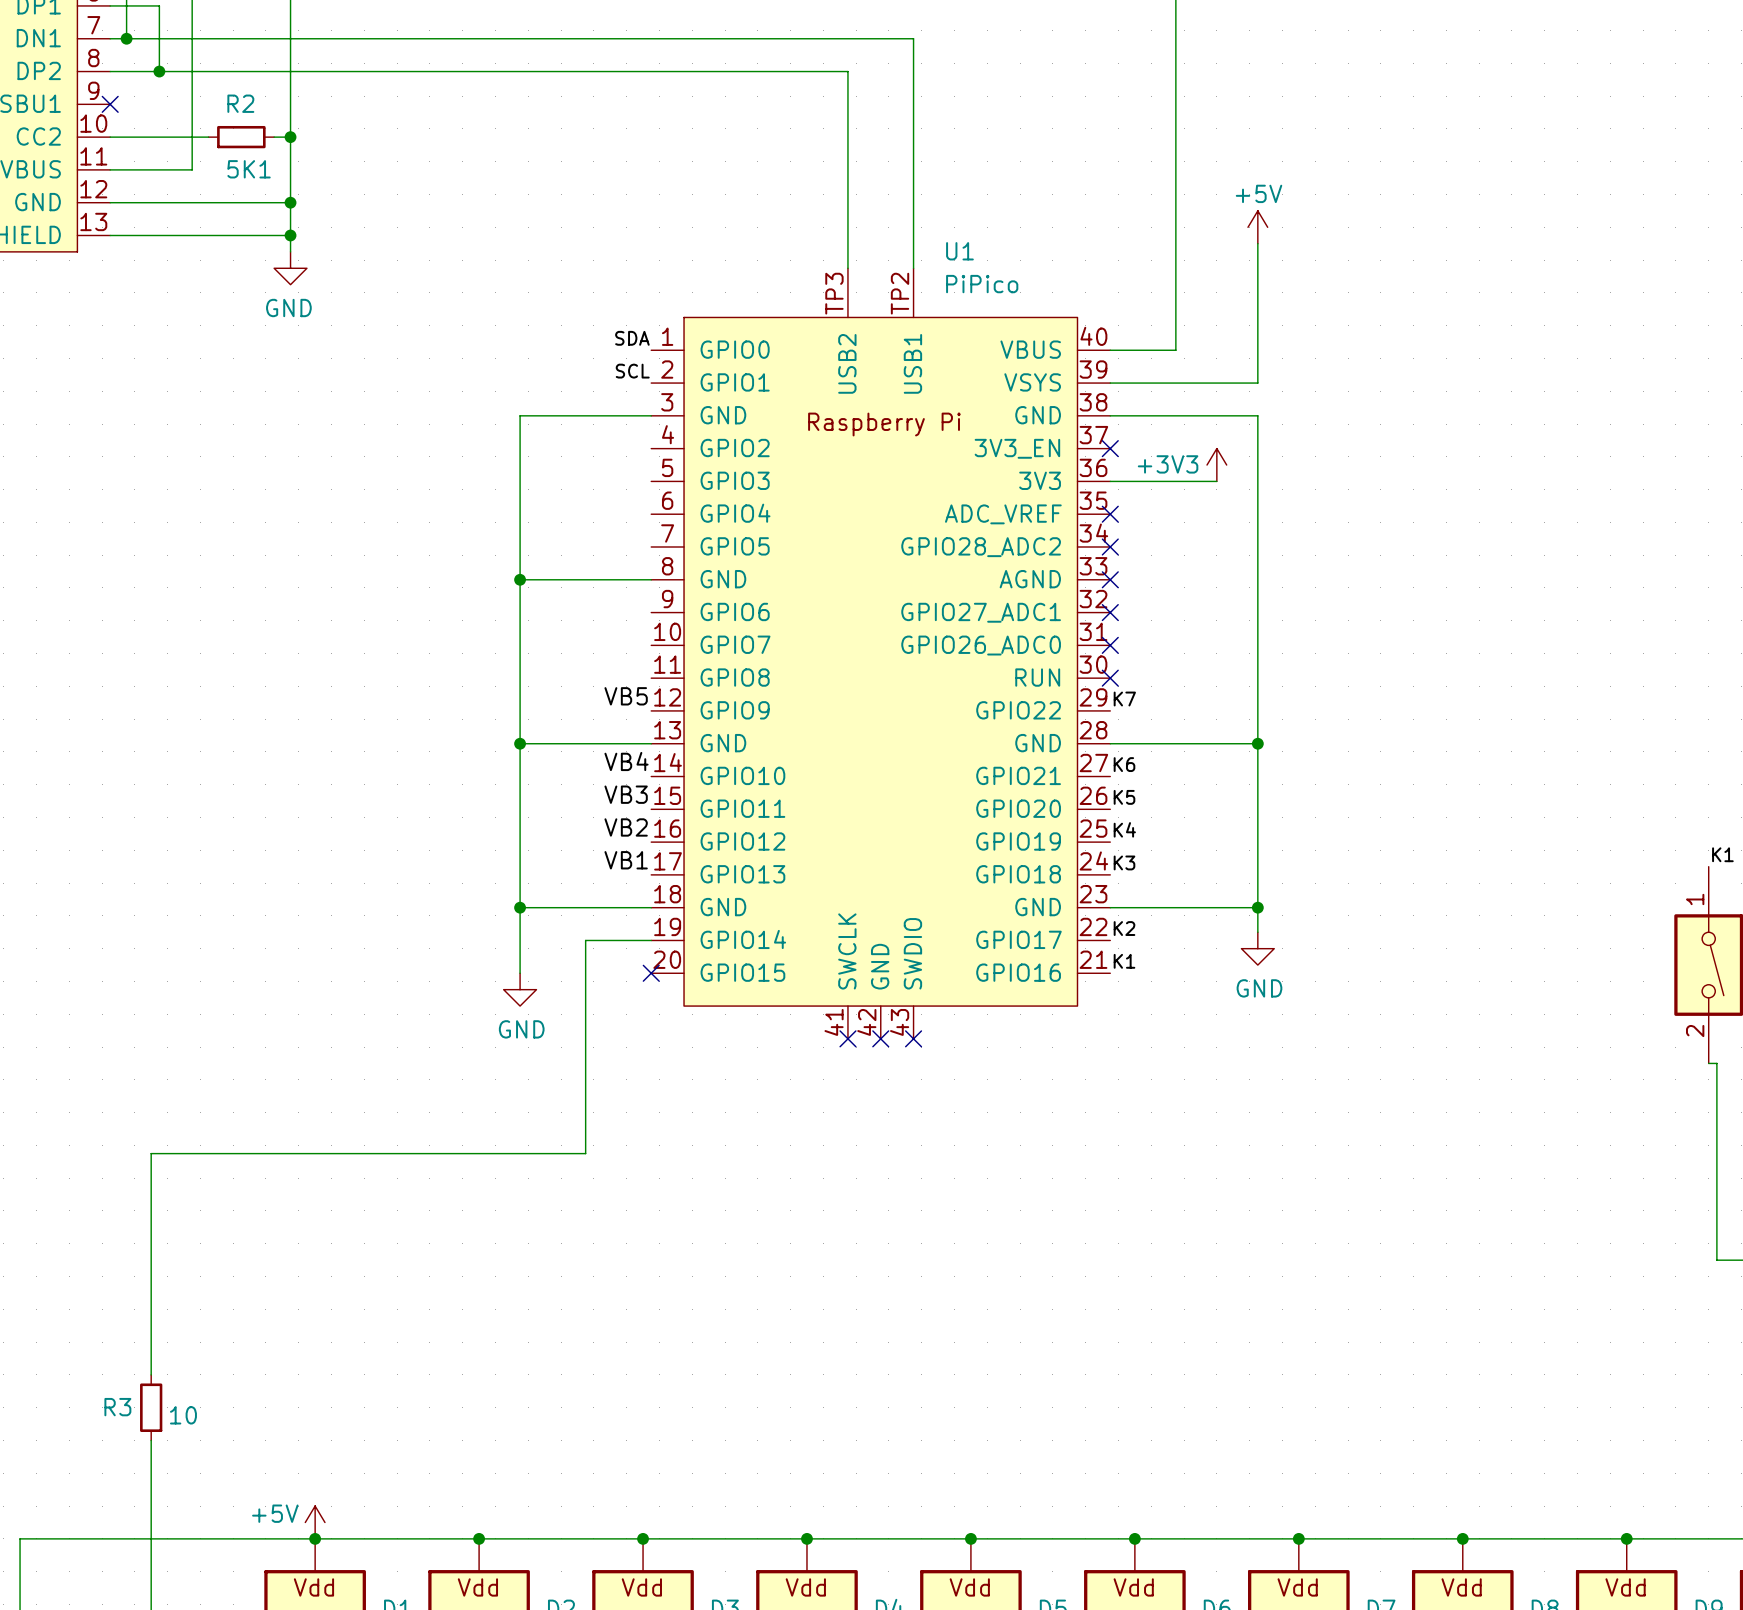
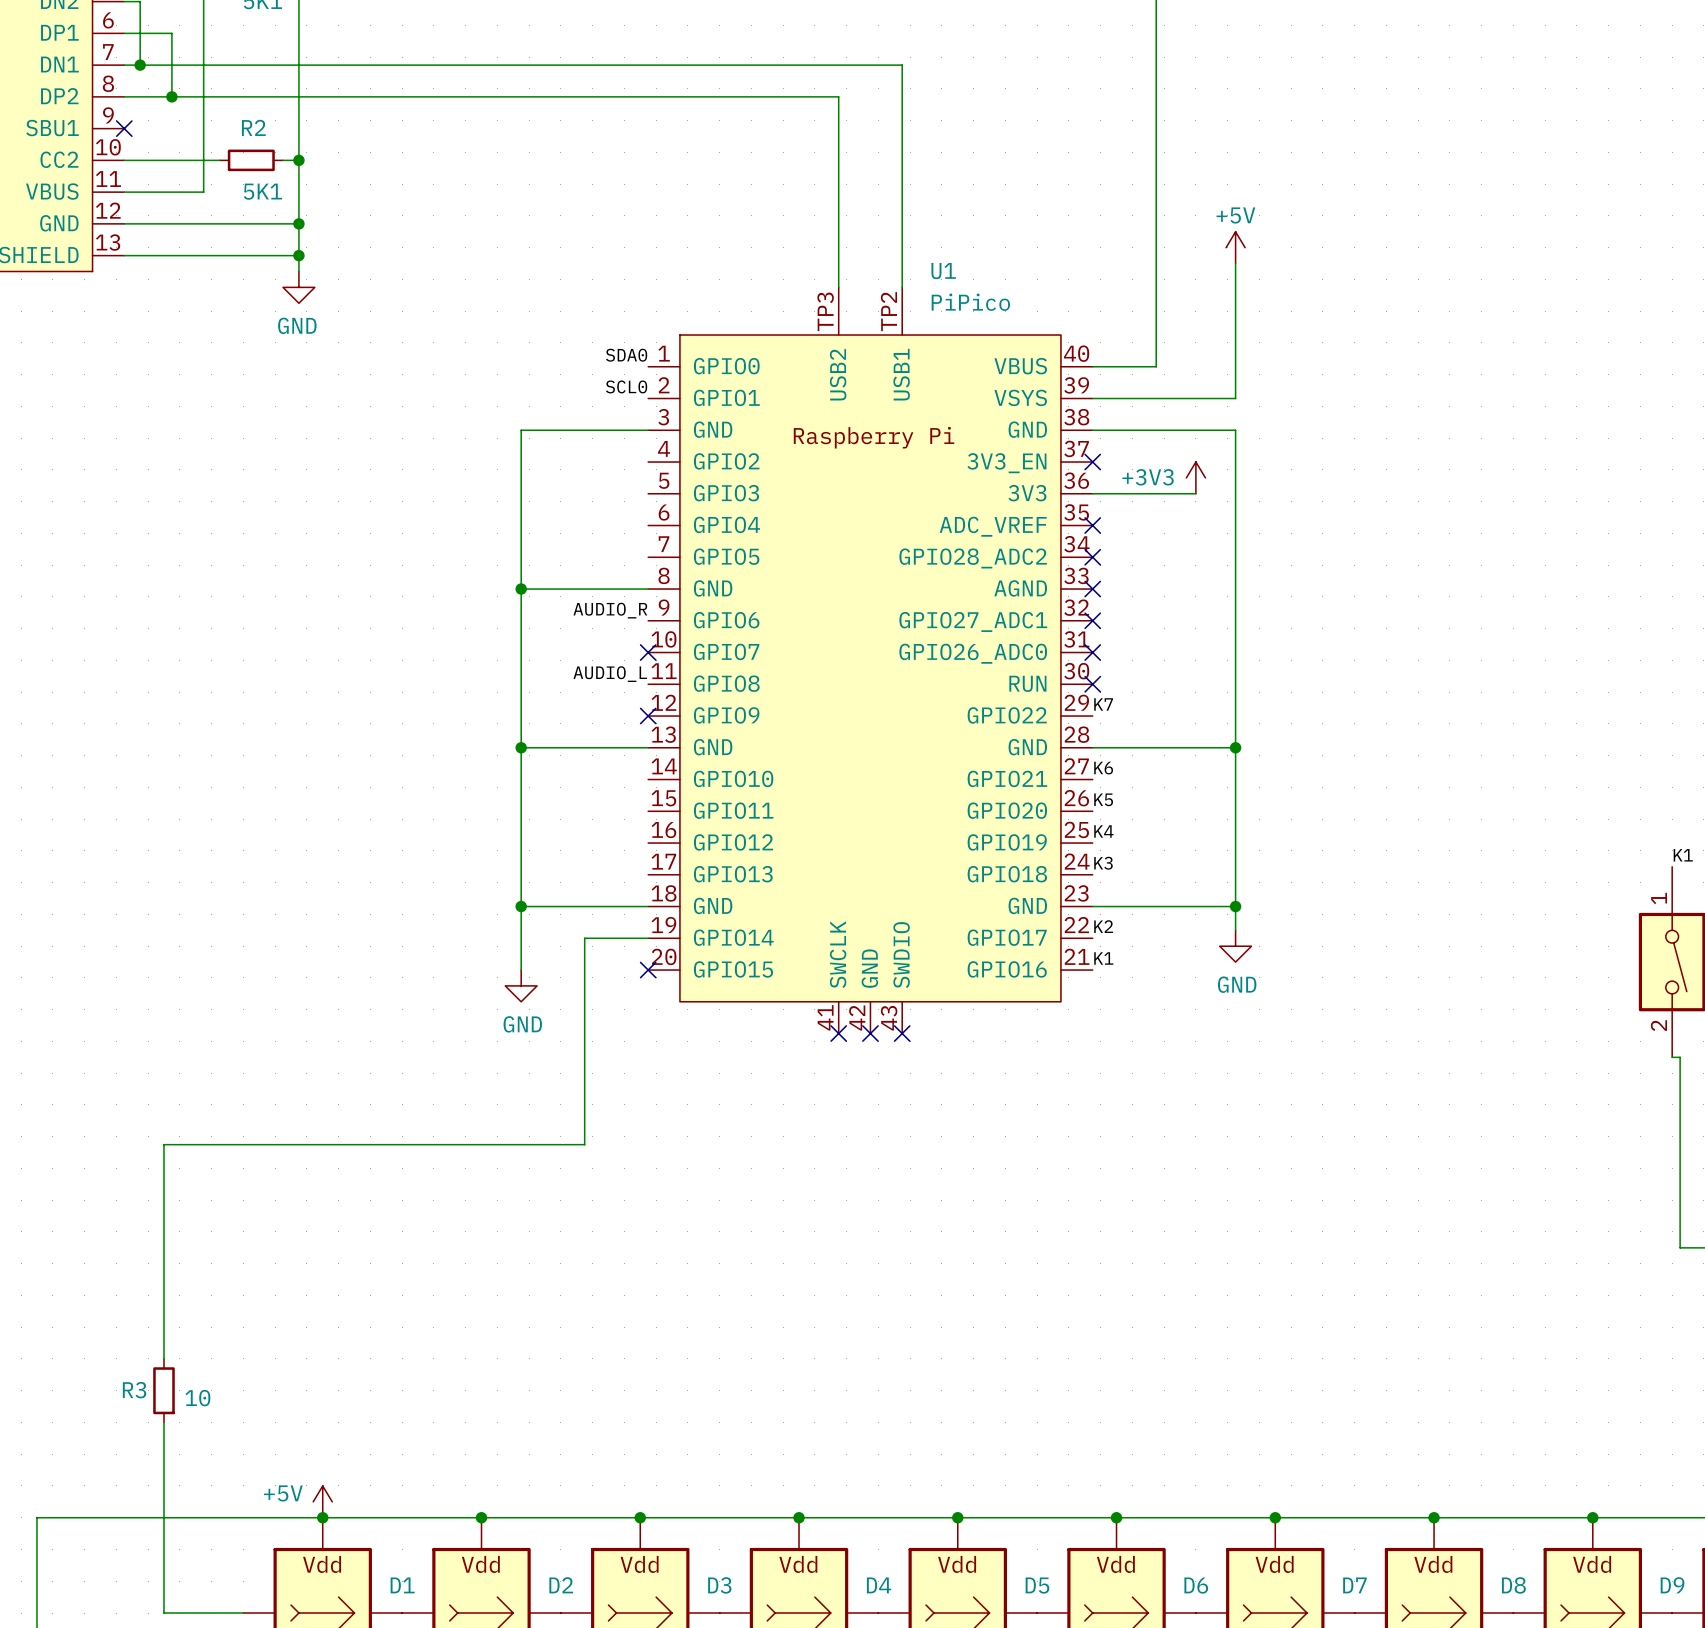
label: SDA (632, 338) -> SDA0 (626, 355)
label: SCL (632, 371) -> SCL0 (626, 386)
label: none -> AUDIO_R (610, 610)
no-connect mark: none -> (648, 652)
label: none -> AUDIO_L (610, 674)
label: VB5 (626, 696) -> none
no-connect mark: none -> (648, 716)
label: VB4 (626, 761) -> none
label: VB3 (626, 794) -> none
label: VB2 (626, 827) -> none
label: VB1 (626, 860) -> none

